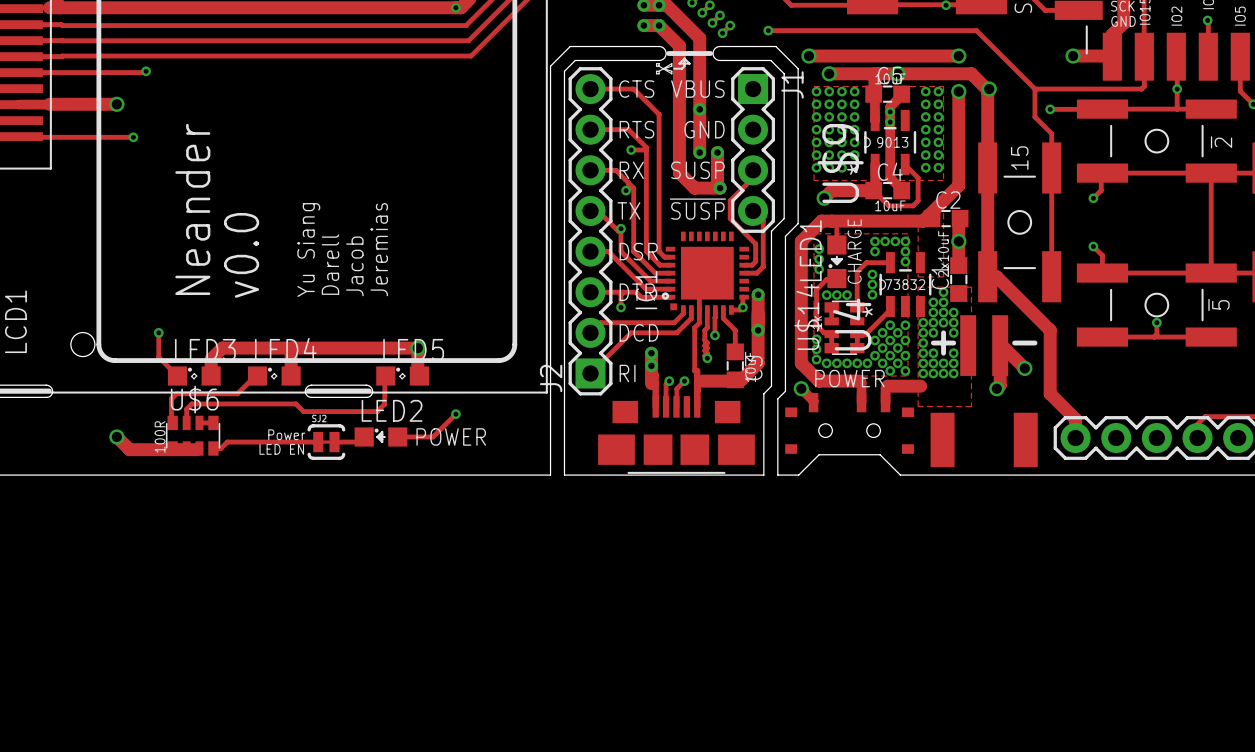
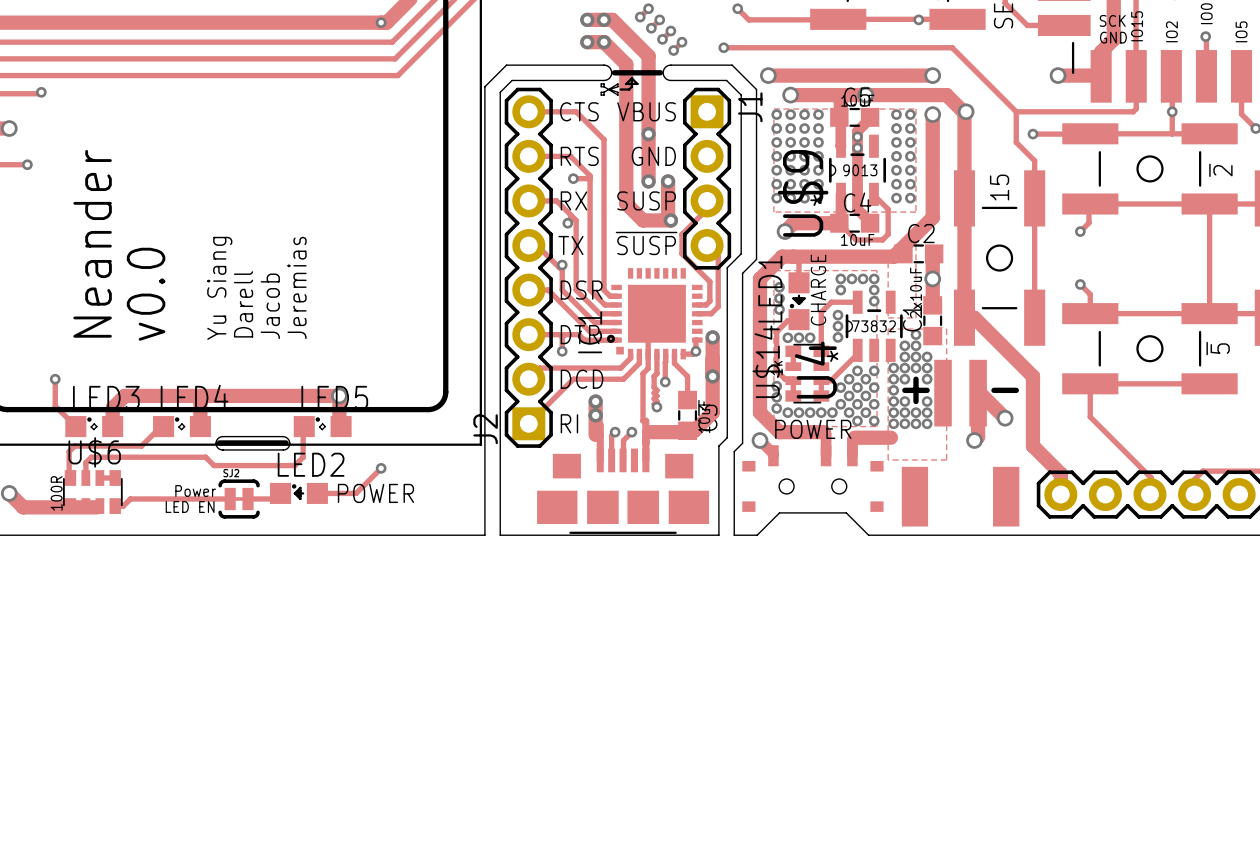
track: (1156, 322) (1156, 334) (1154, 337) -> none
via: (1156, 322) -> none
track: none -> (1090, 383) (1090, 417) (1151, 478) (1149, 499)

